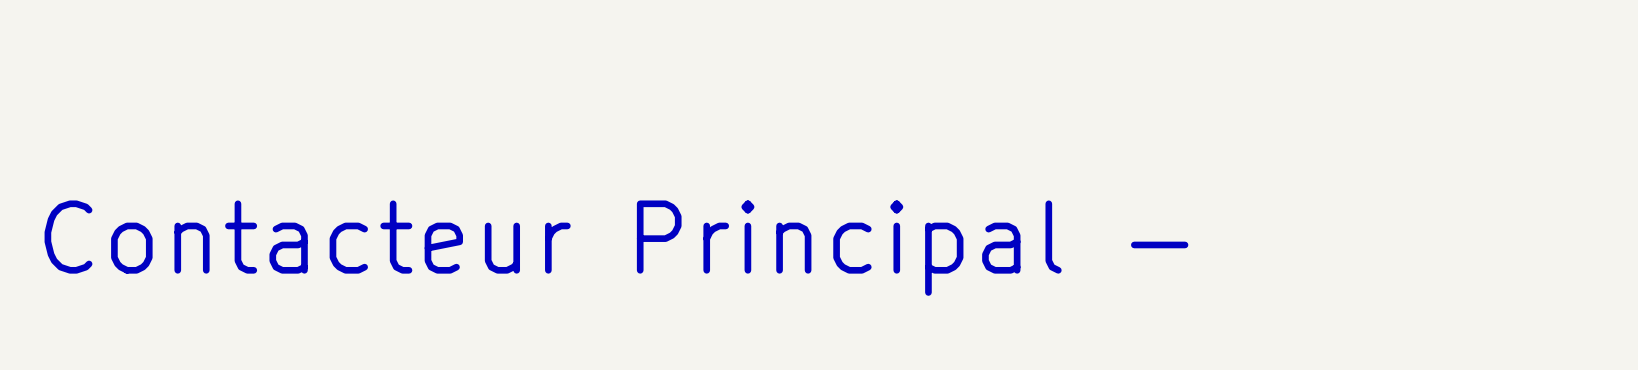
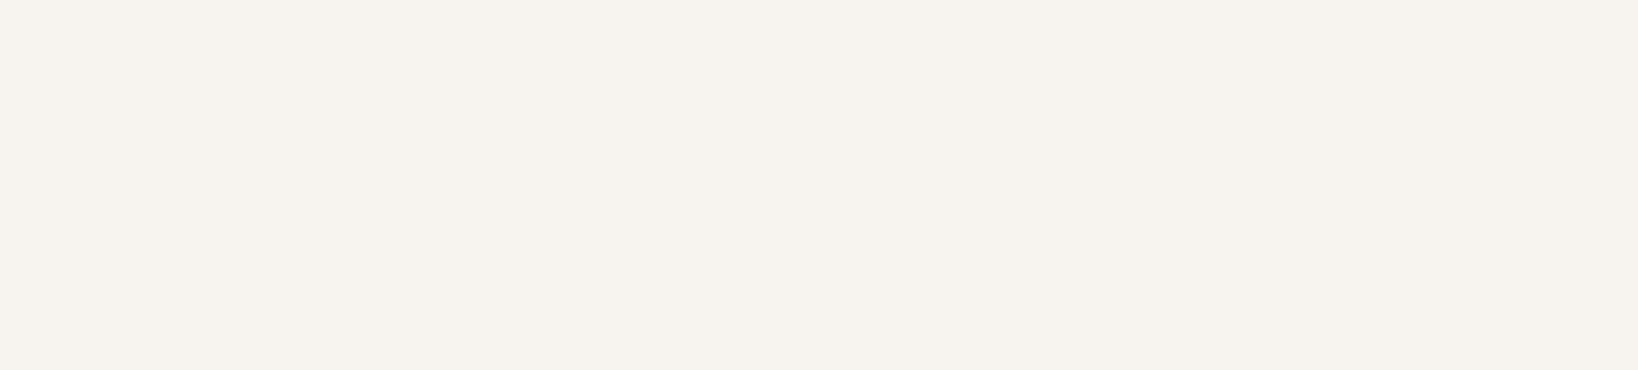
text: Contacteur Principal - (616, 248) -> none

